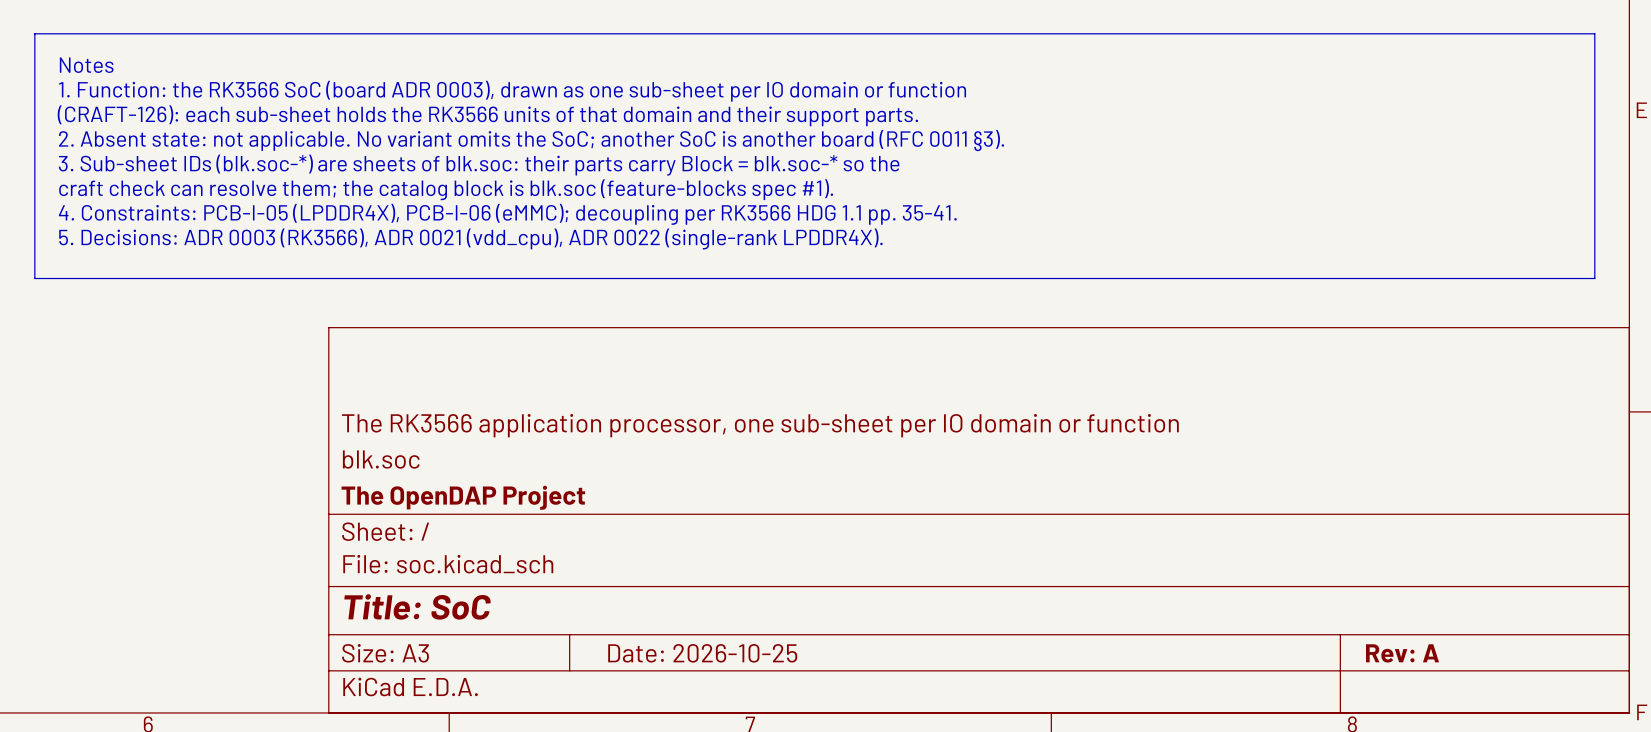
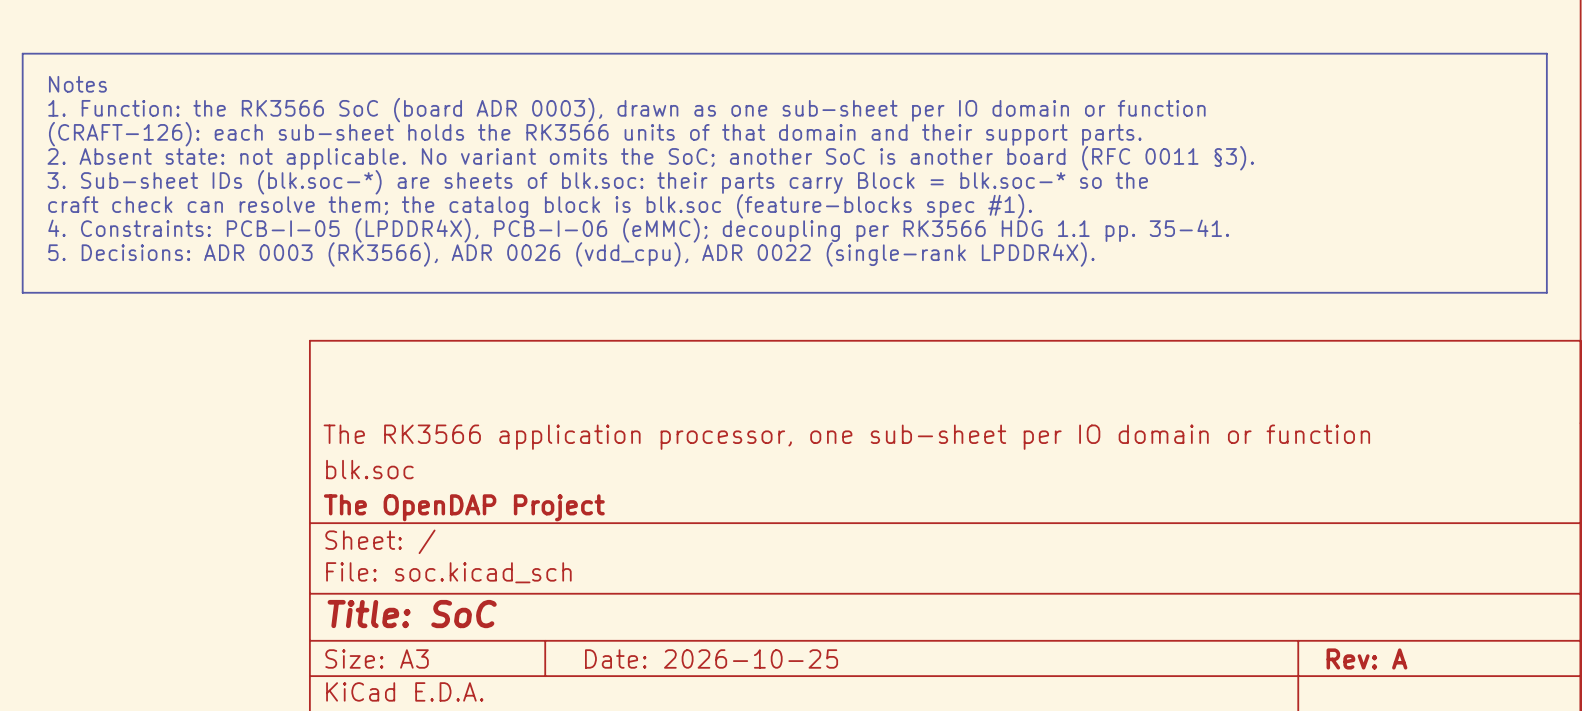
text: 5. Decisions: ADR 0003 (RK3566), ADR 0021 (vdd_cpu), ADR 0022 (single-rank LPDDR4X). (470, 238) -> 5. Decisions: ADR 0003 (RK3566), ADR 0026 (vdd_cpu), ADR 0022 (single-rank LPDDR4X). (571, 254)

